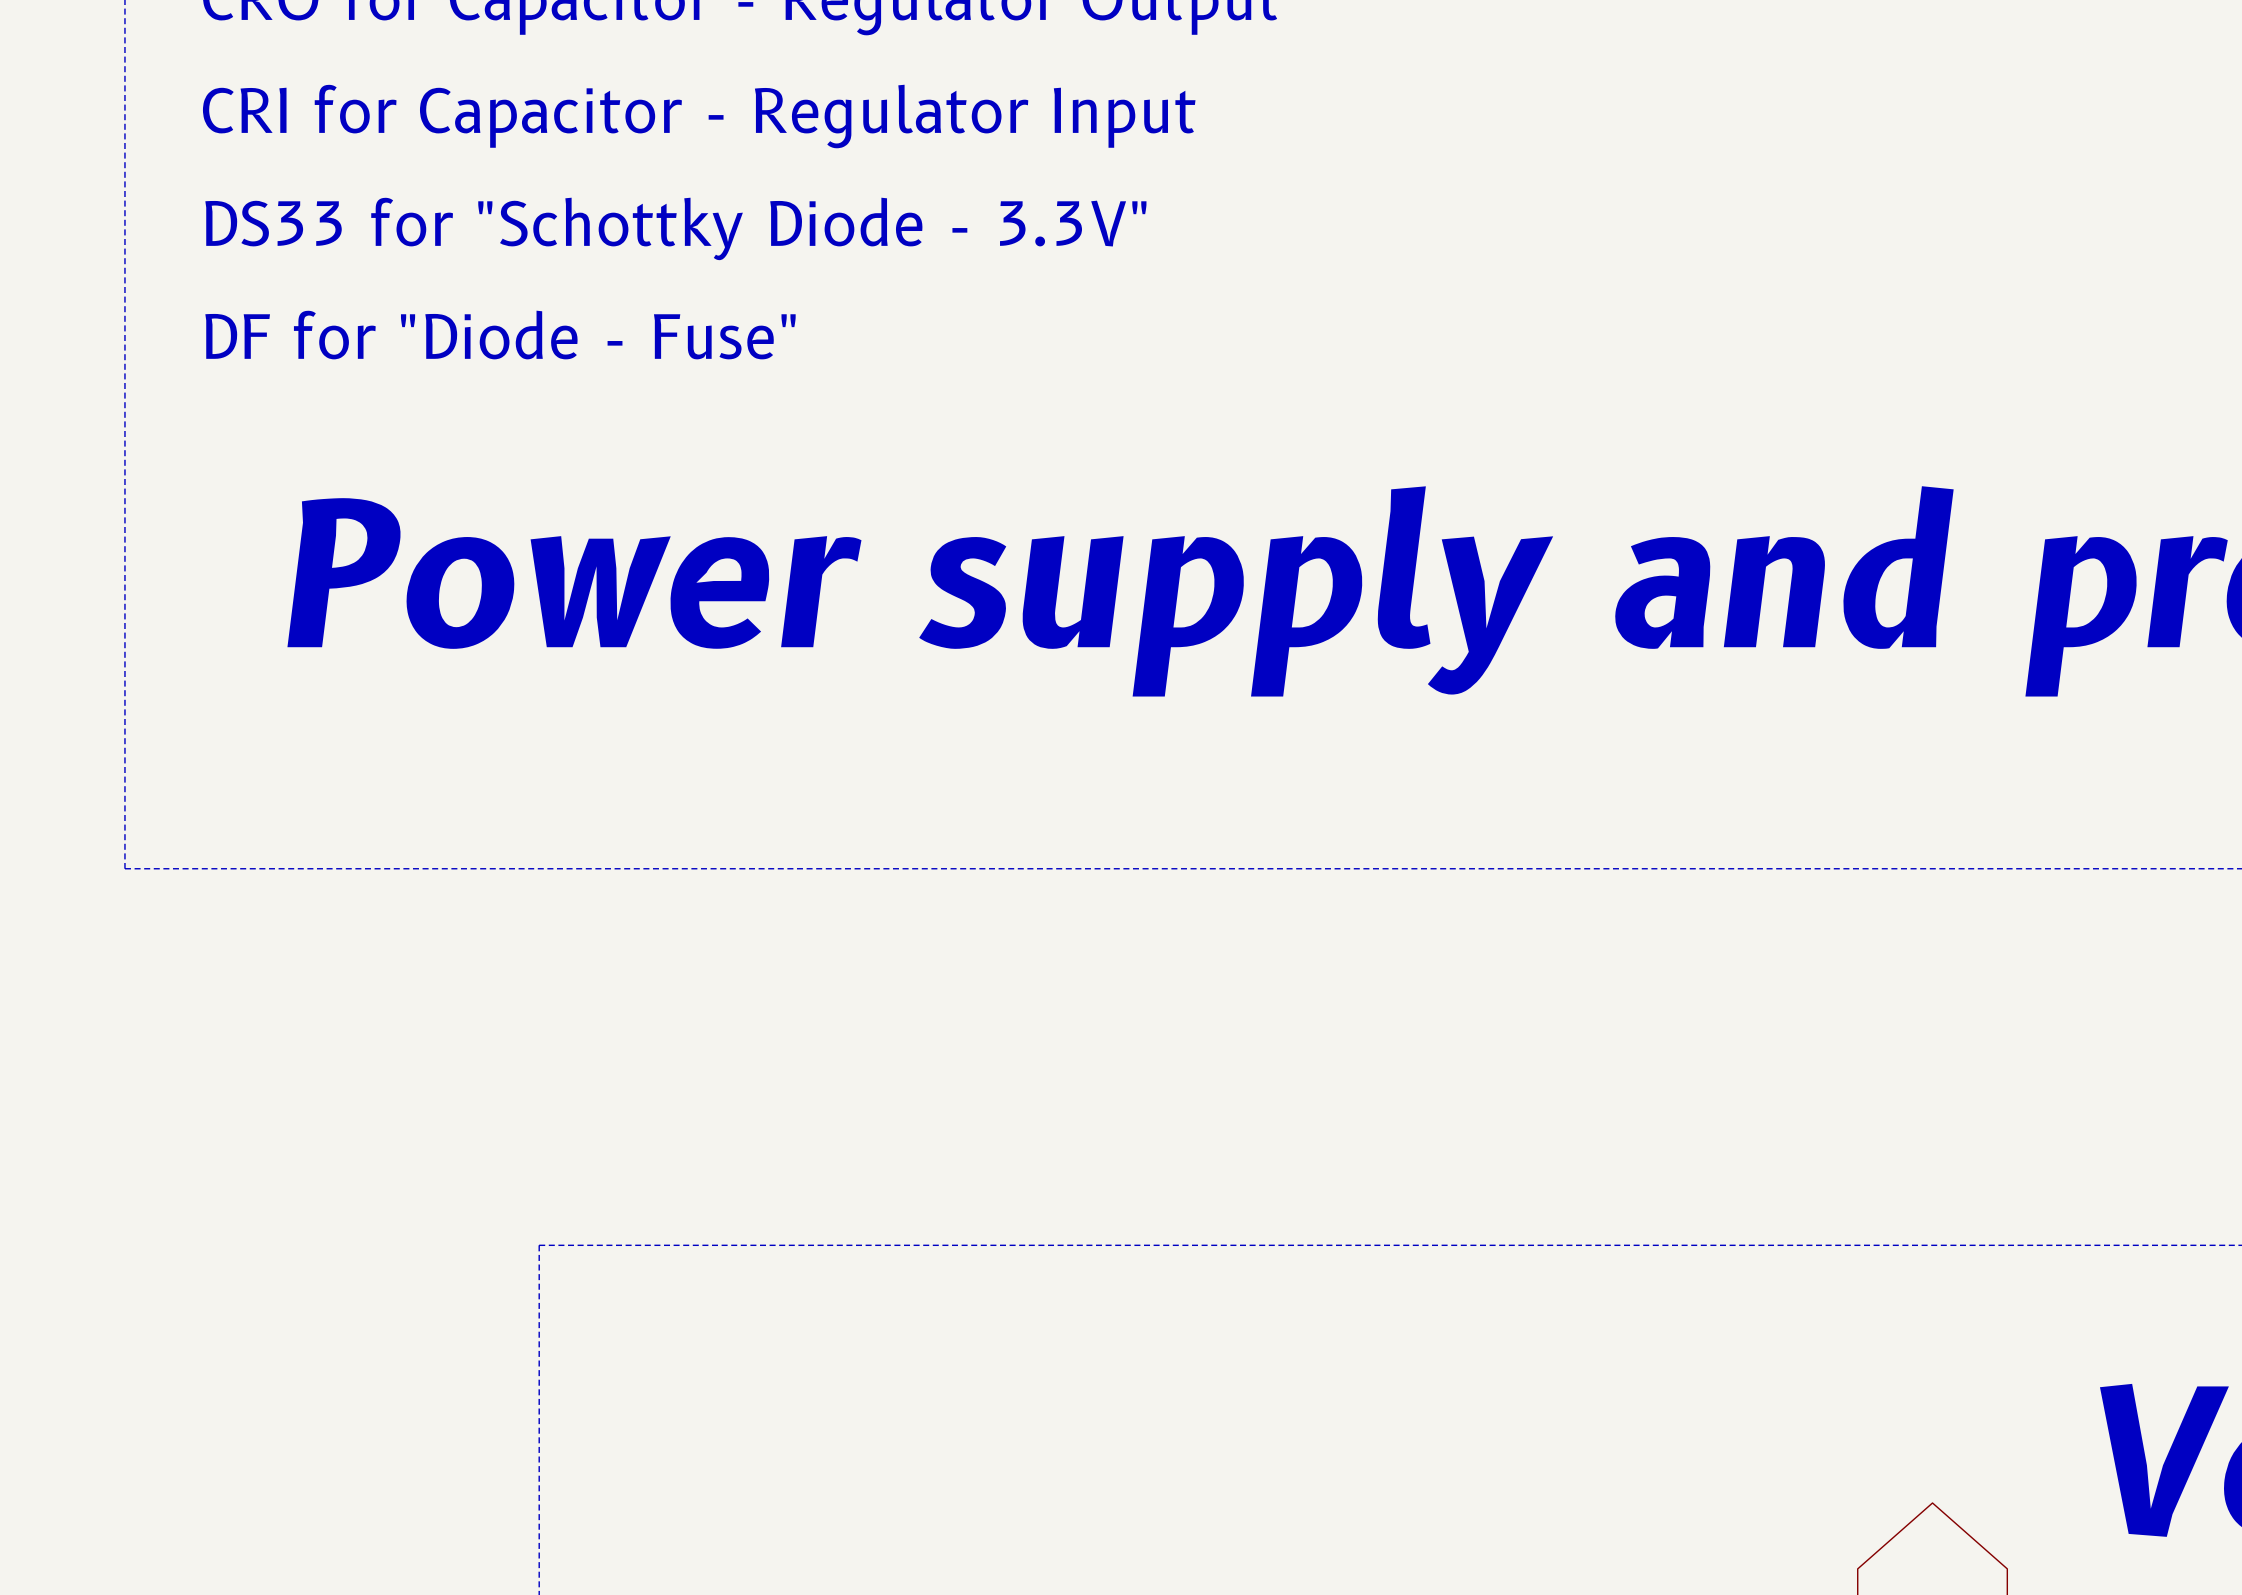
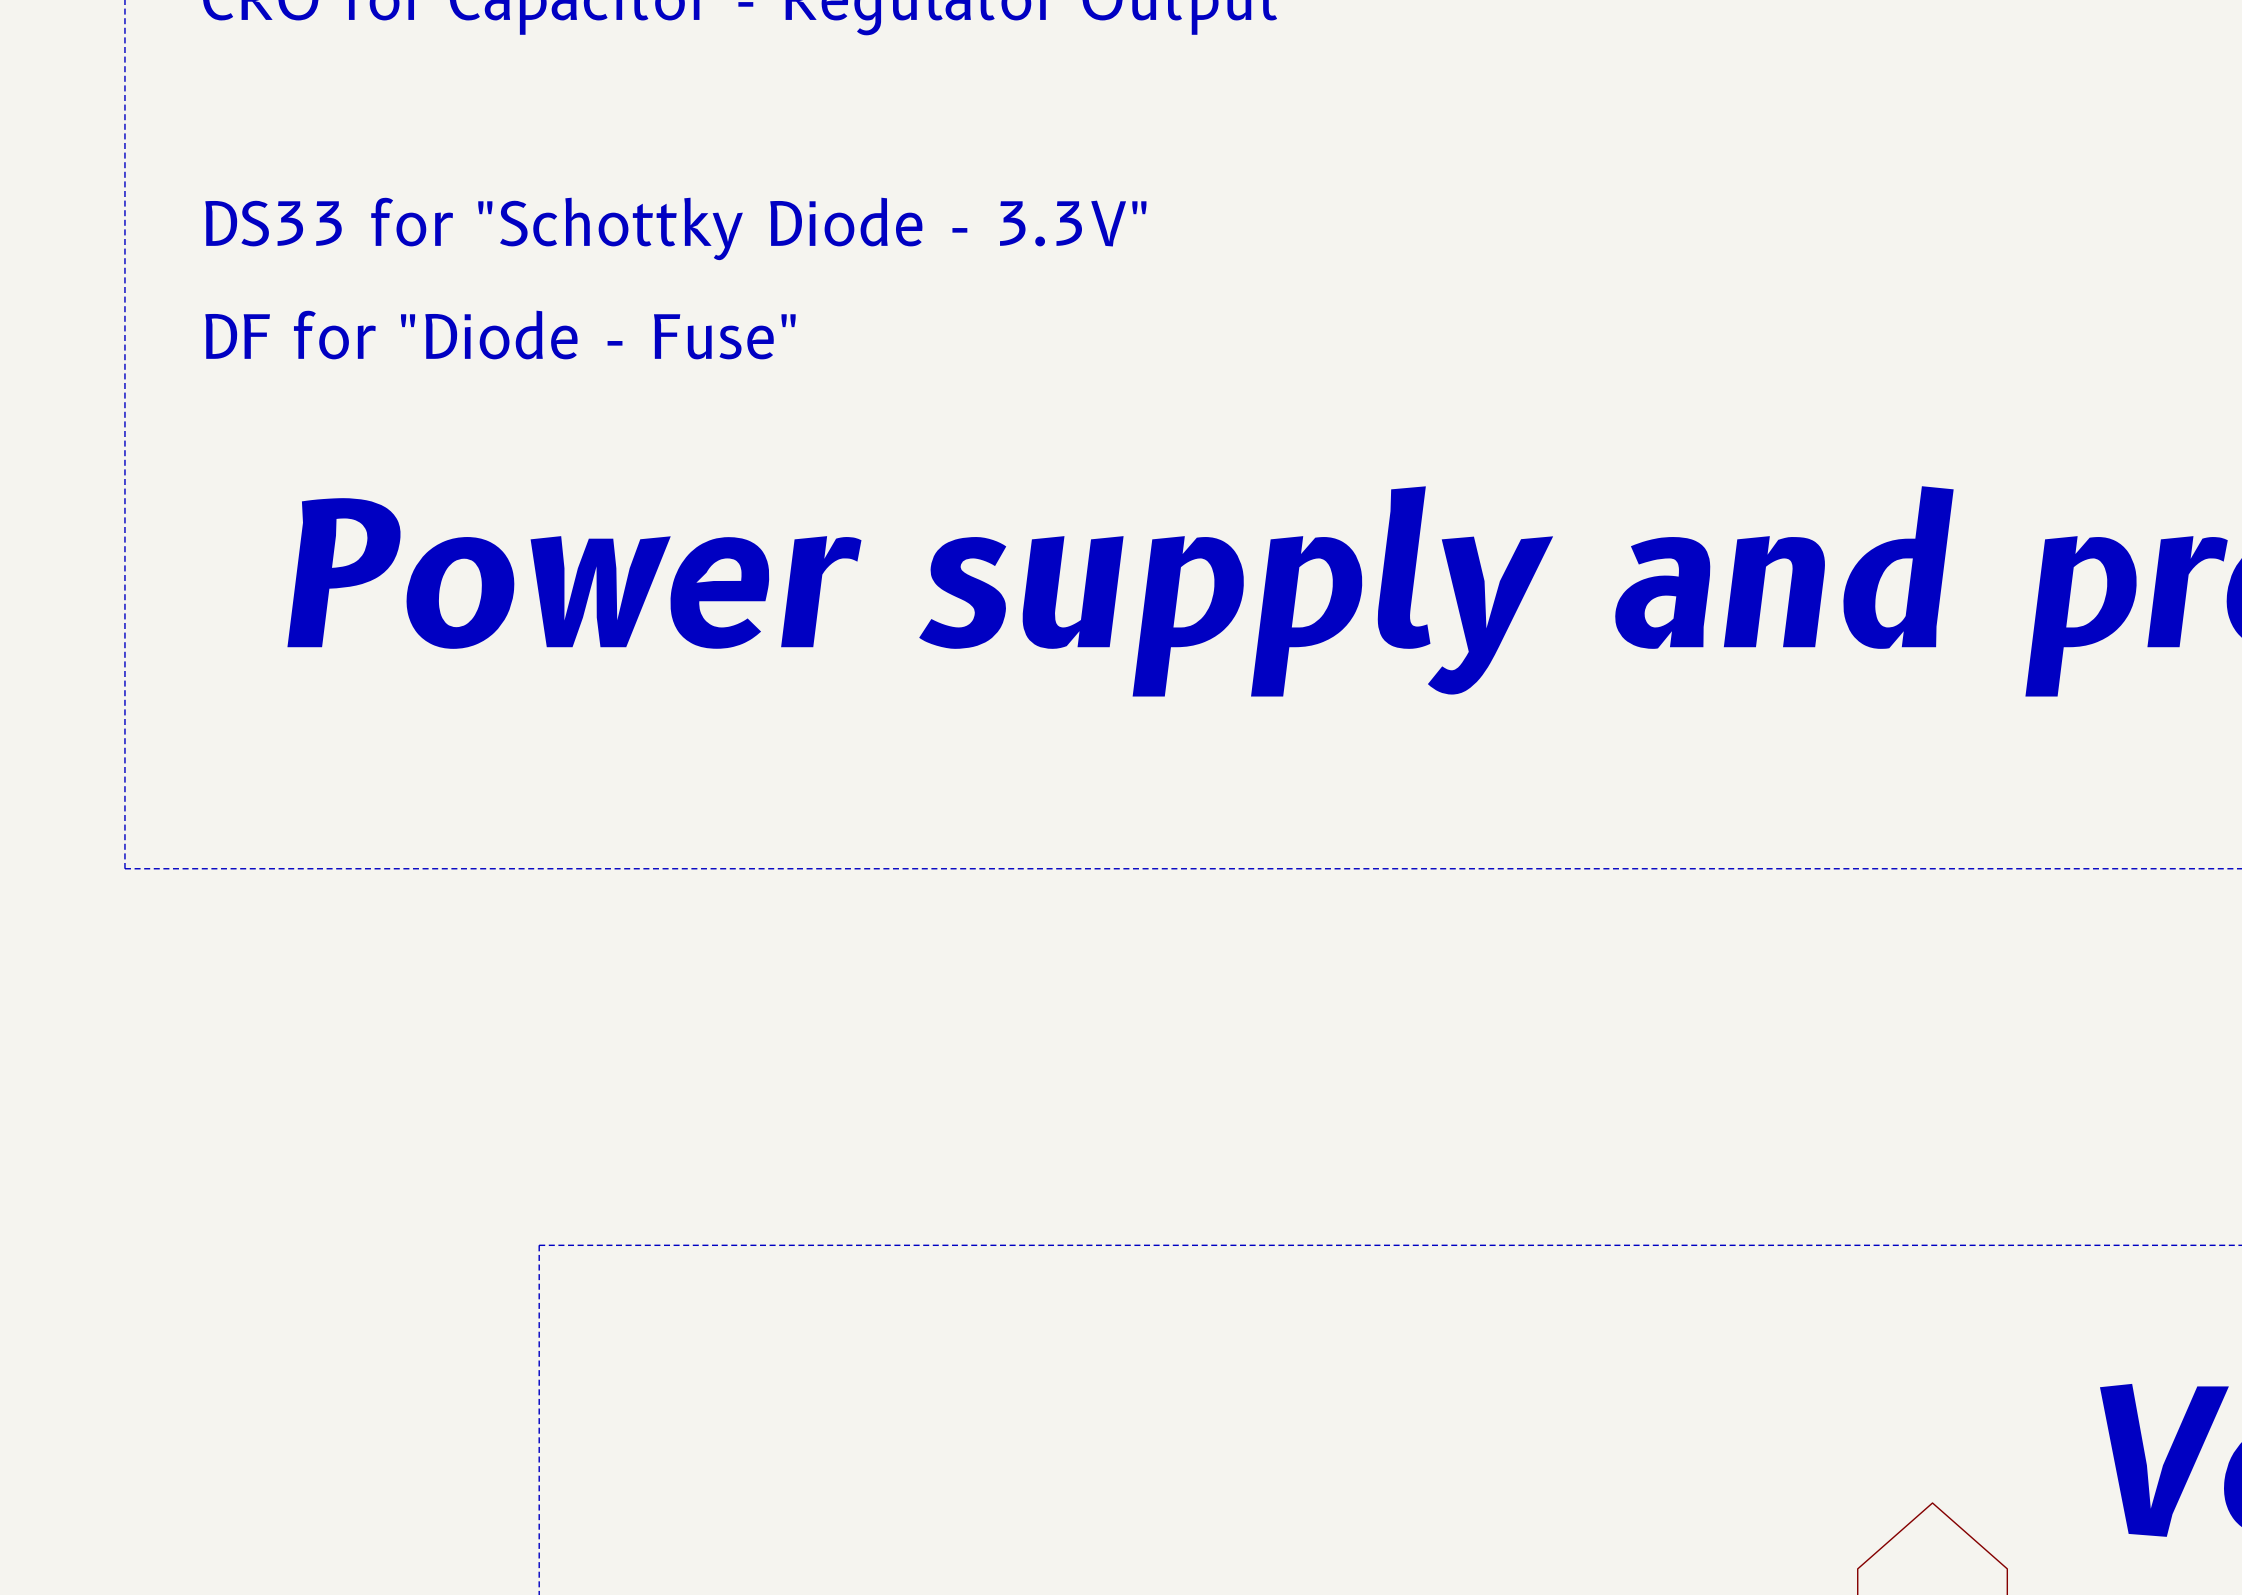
text: CRI for Capacitor - Regulator Input (699, 116) -> none

